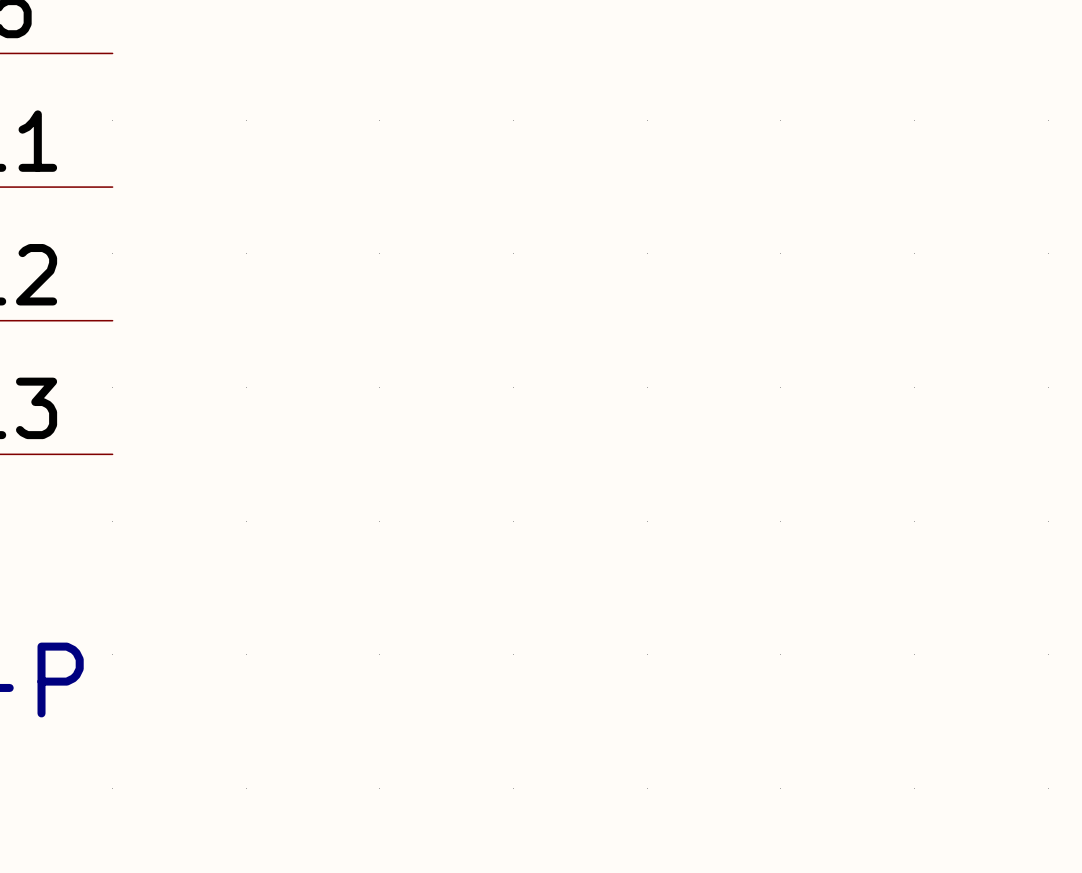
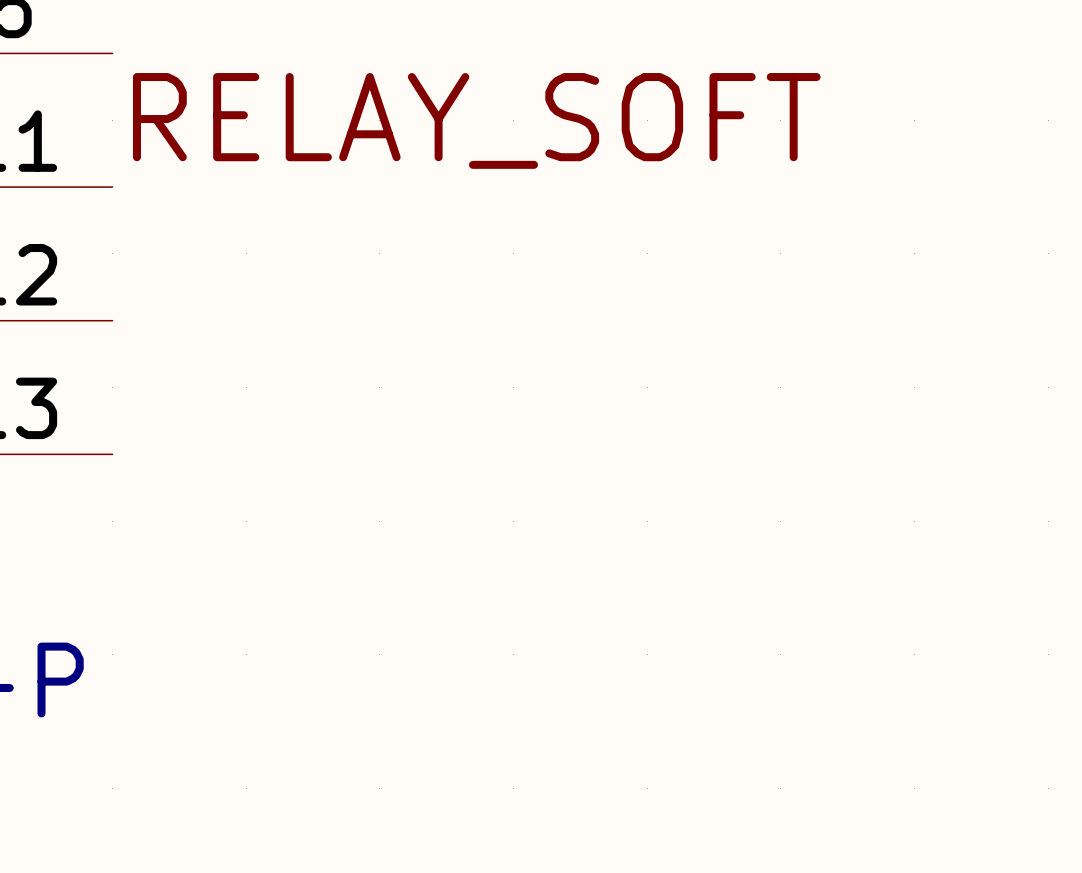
label: none -> RELAY_SOFT (476, 120)

